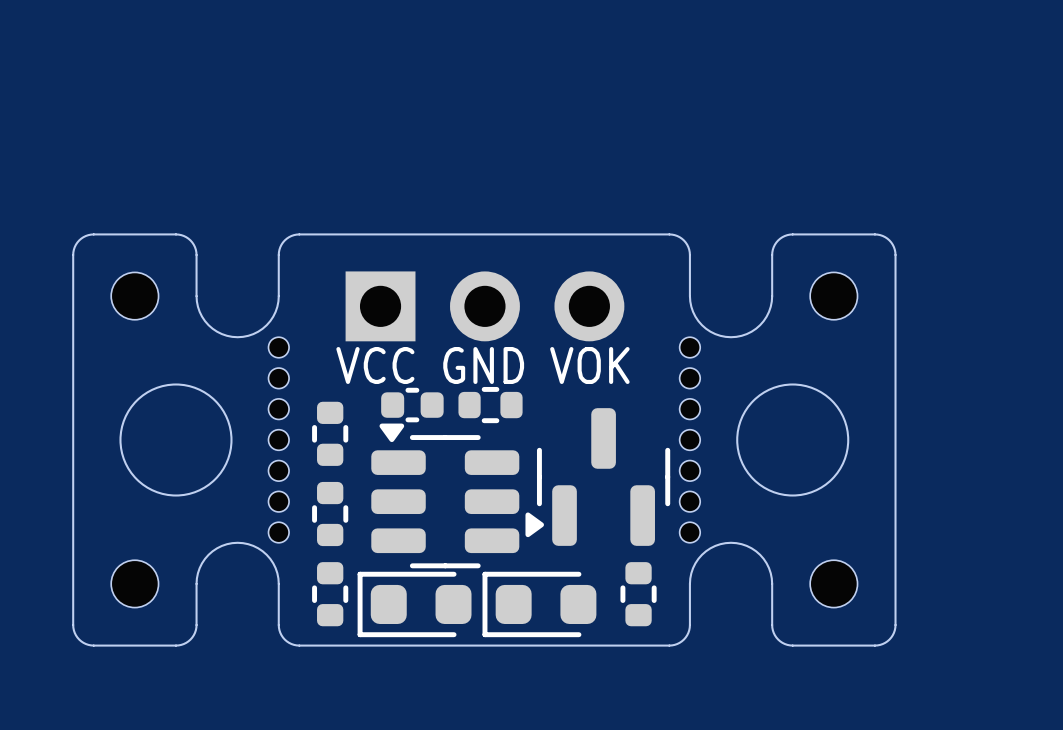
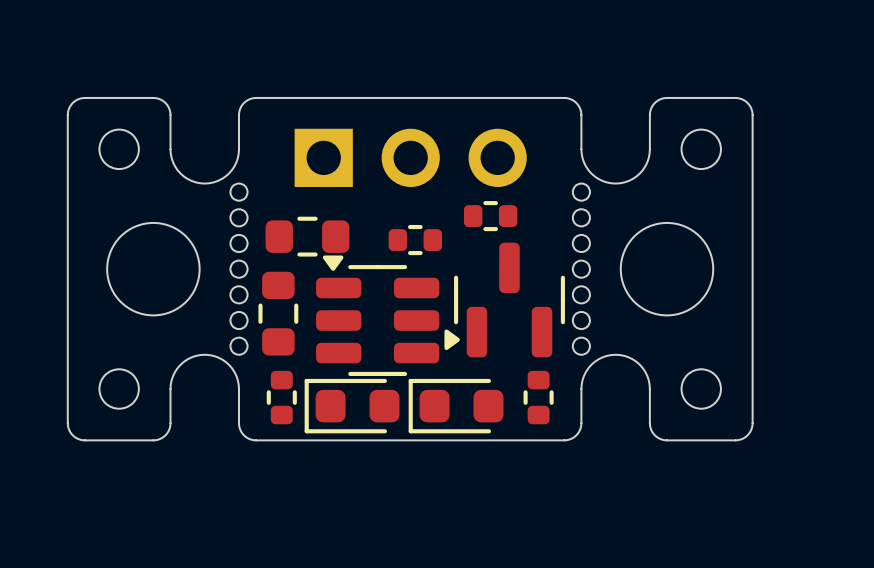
text: VCC GND VOK (482, 365) -> none
part: none -> (307, 236)
part: (412, 405) -> none
part rotation: 0° (330, 433) -> 90° clockwise (490, 216)
part position: (330, 433) -> (490, 216)
part footprint: [312, 481, 349, 547] -> [258, 271, 299, 356]

